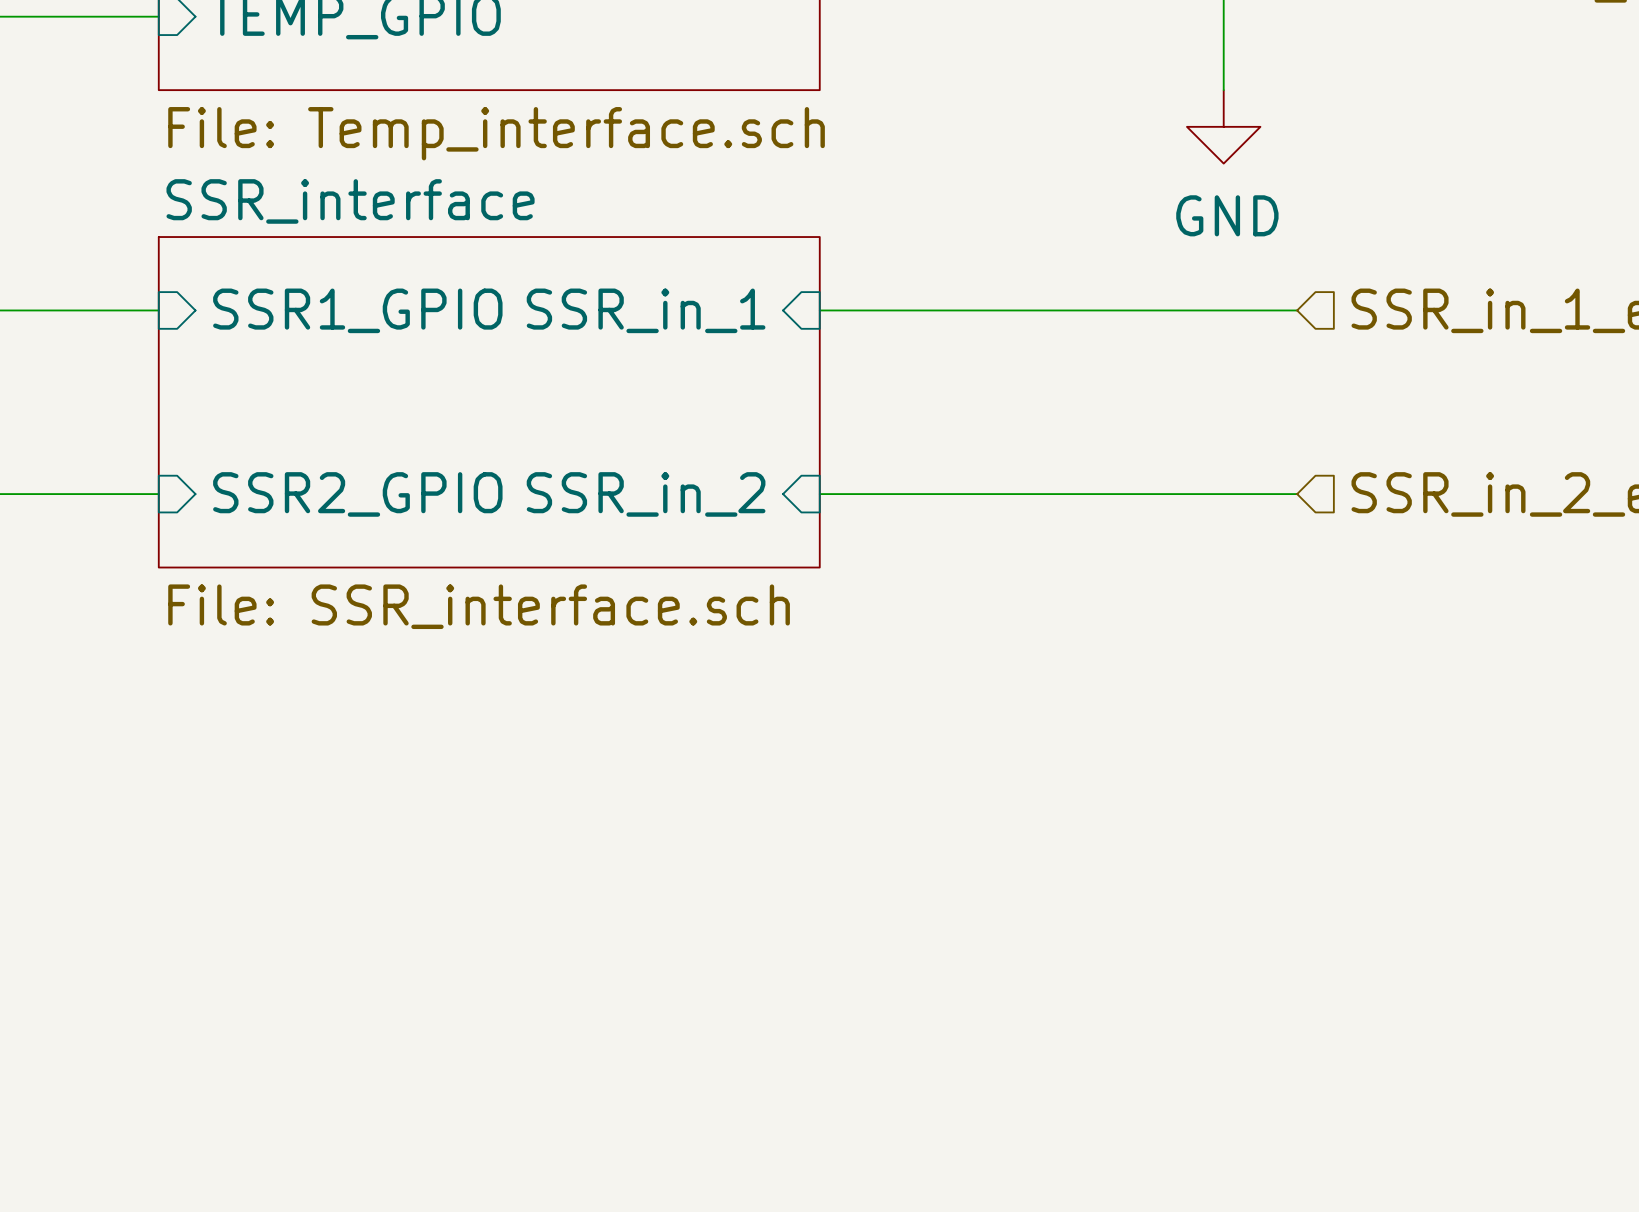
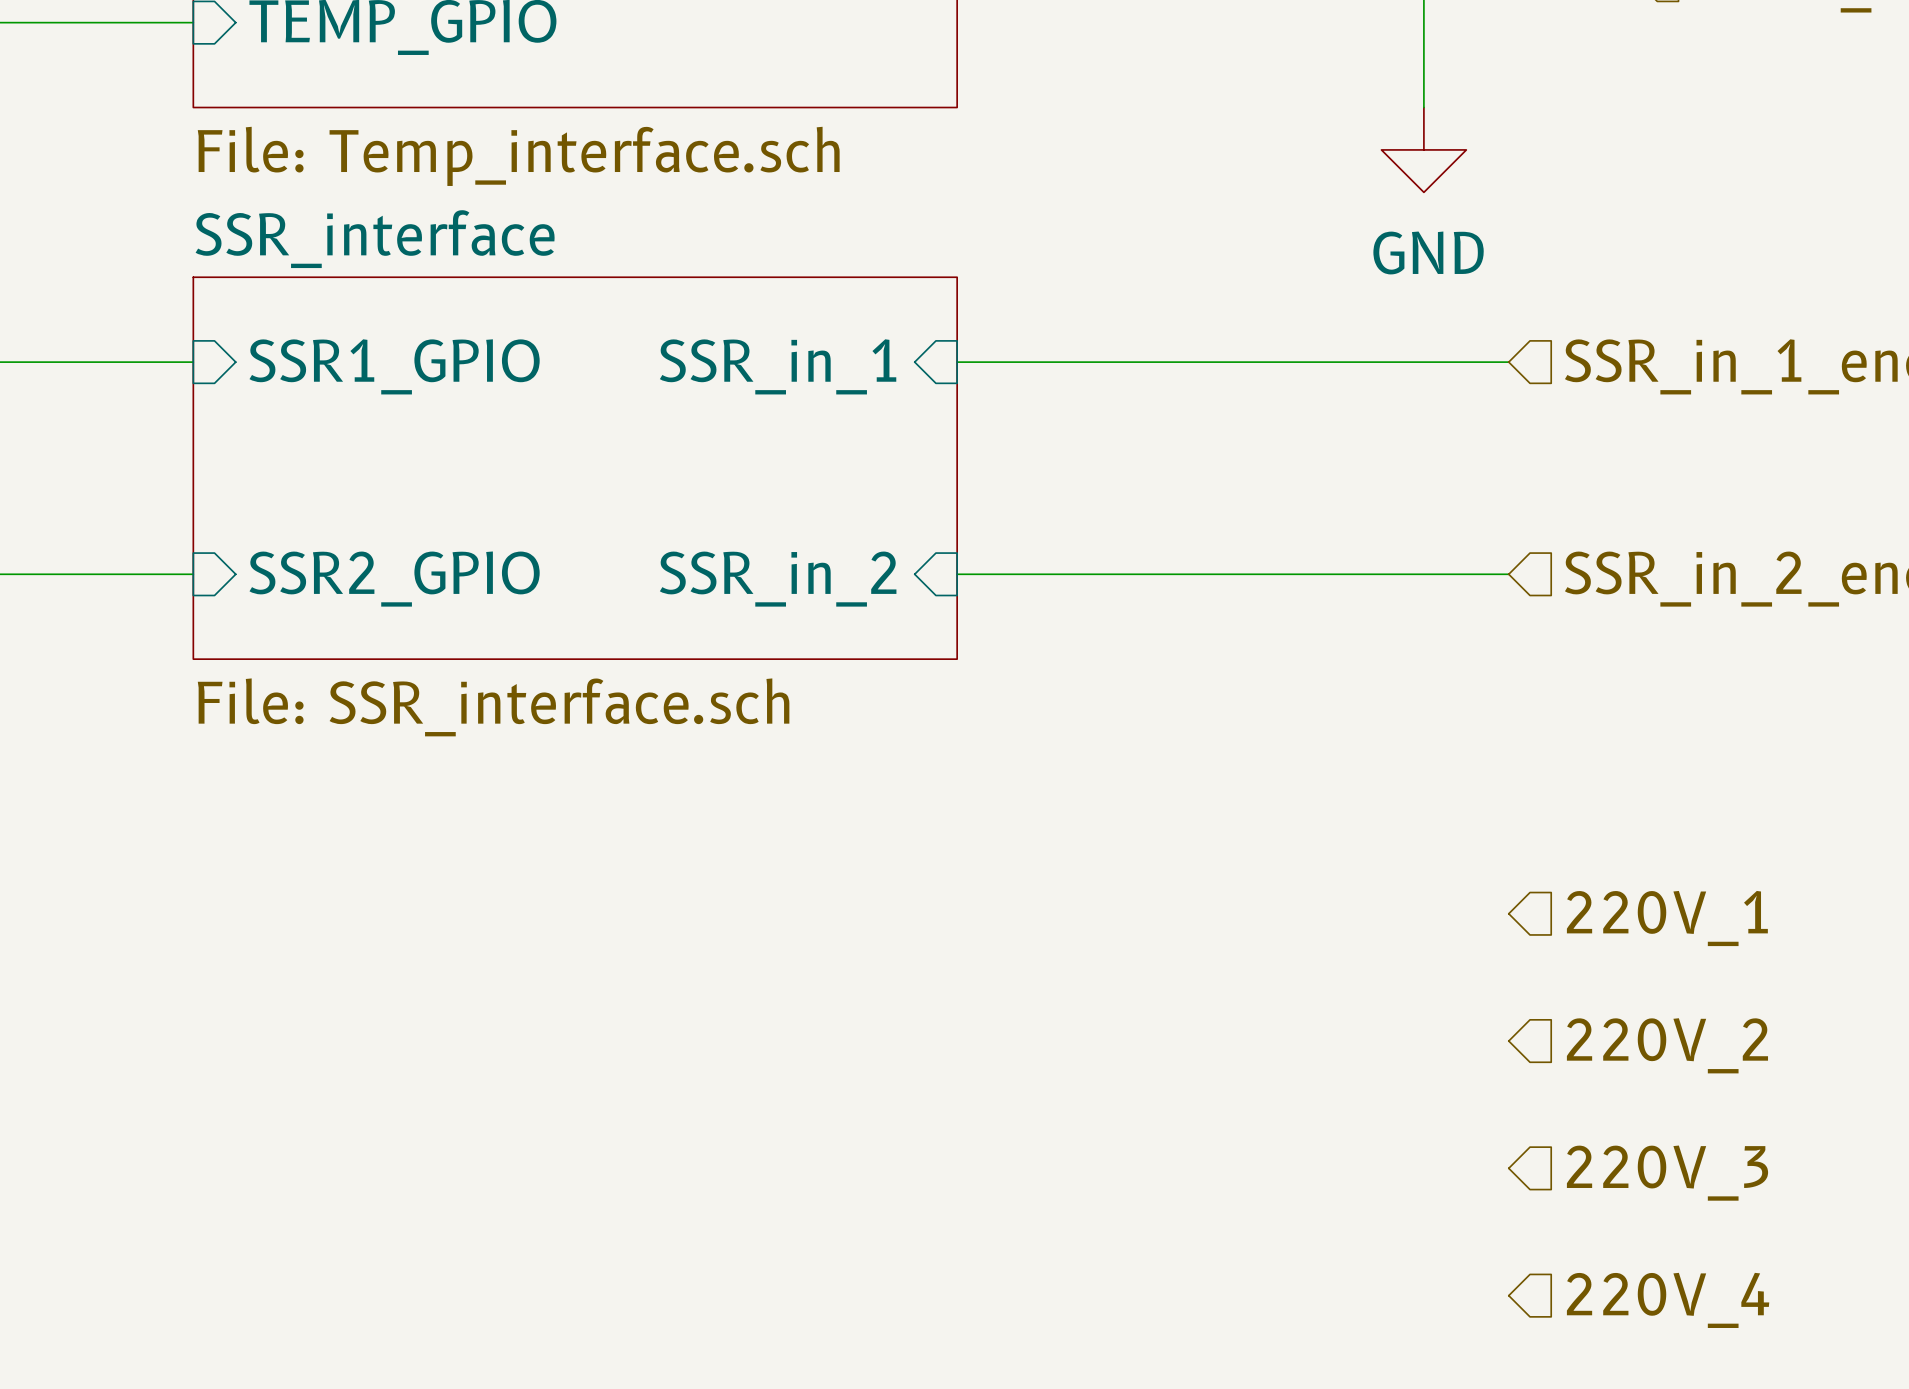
hierarchical label: none -> 220V_1 (1667, 918)
hierarchical label: none -> 220V_2 (1667, 1045)
hierarchical label: none -> 220V_3 (1667, 1173)
hierarchical label: none -> 220V_4 (1668, 1300)

